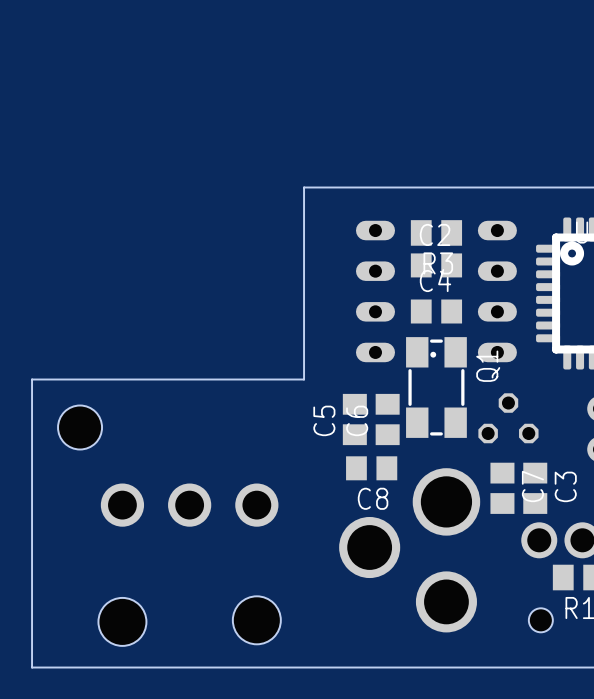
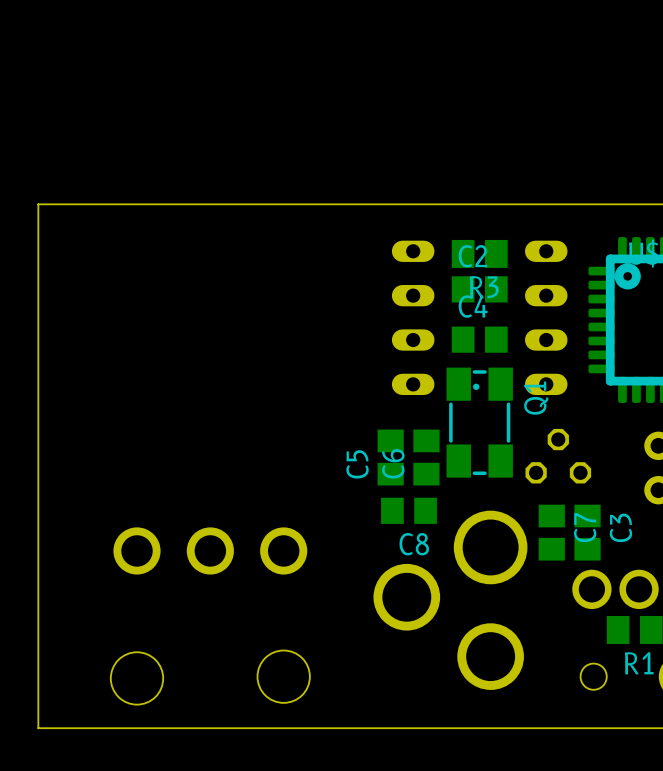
board edge: (304, 187) (304, 379) (32, 379) -> (335, 204) (38, 204) (38, 413)
hole: (80, 427) -> none

